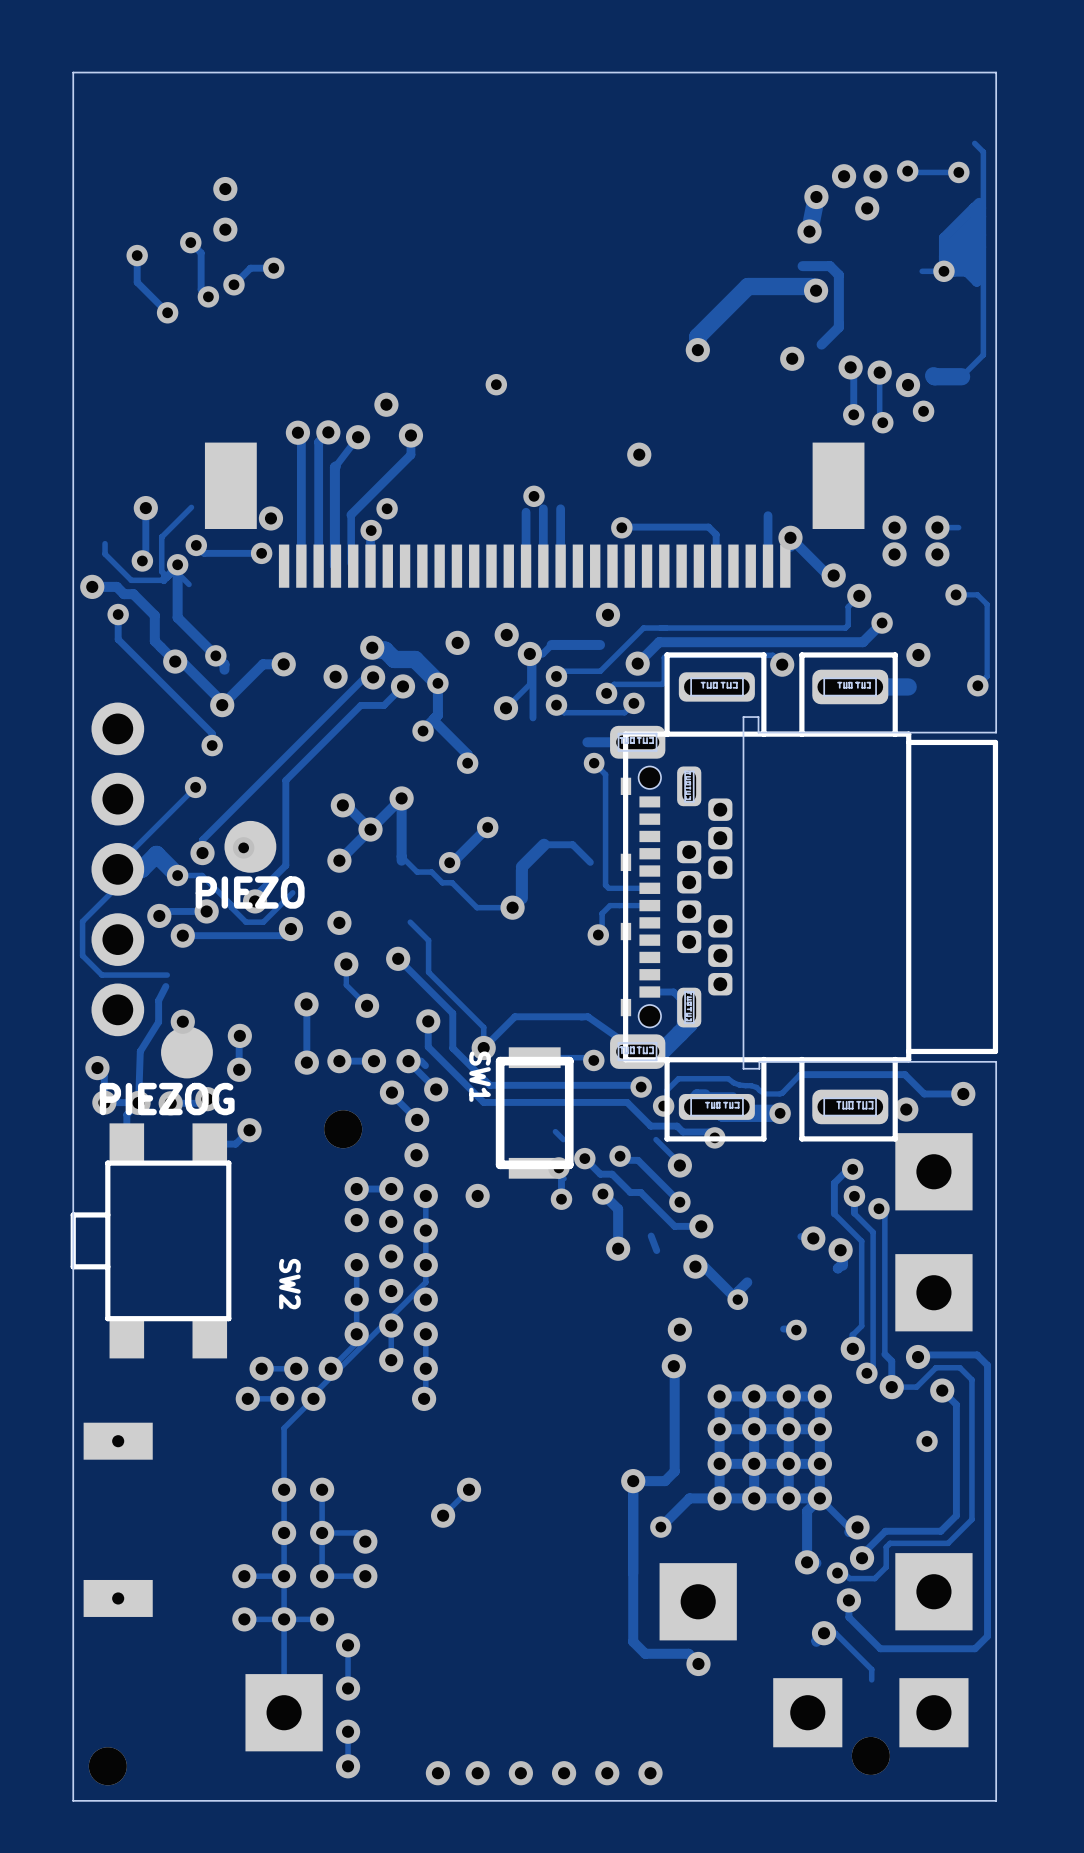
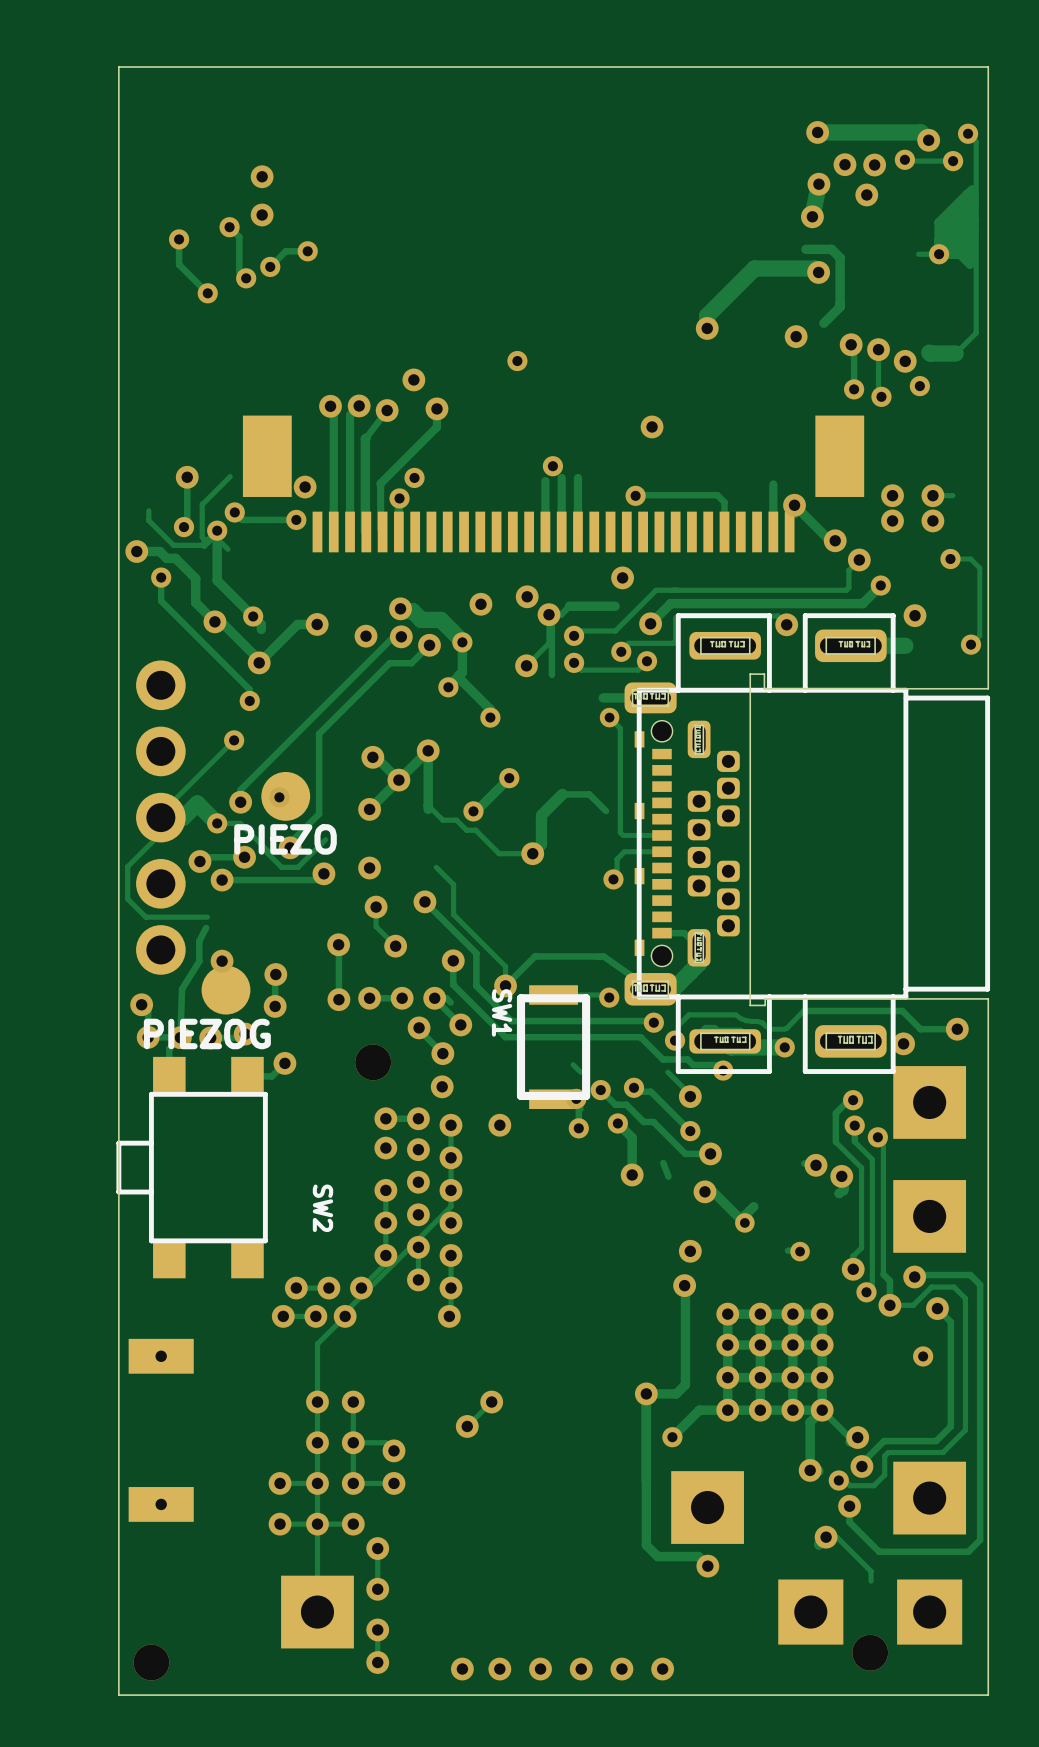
track: none -> (817, 132) (920, 132) (928, 140)
via: none -> (817, 132)
via: none -> (968, 133)
via: none -> (928, 140)

